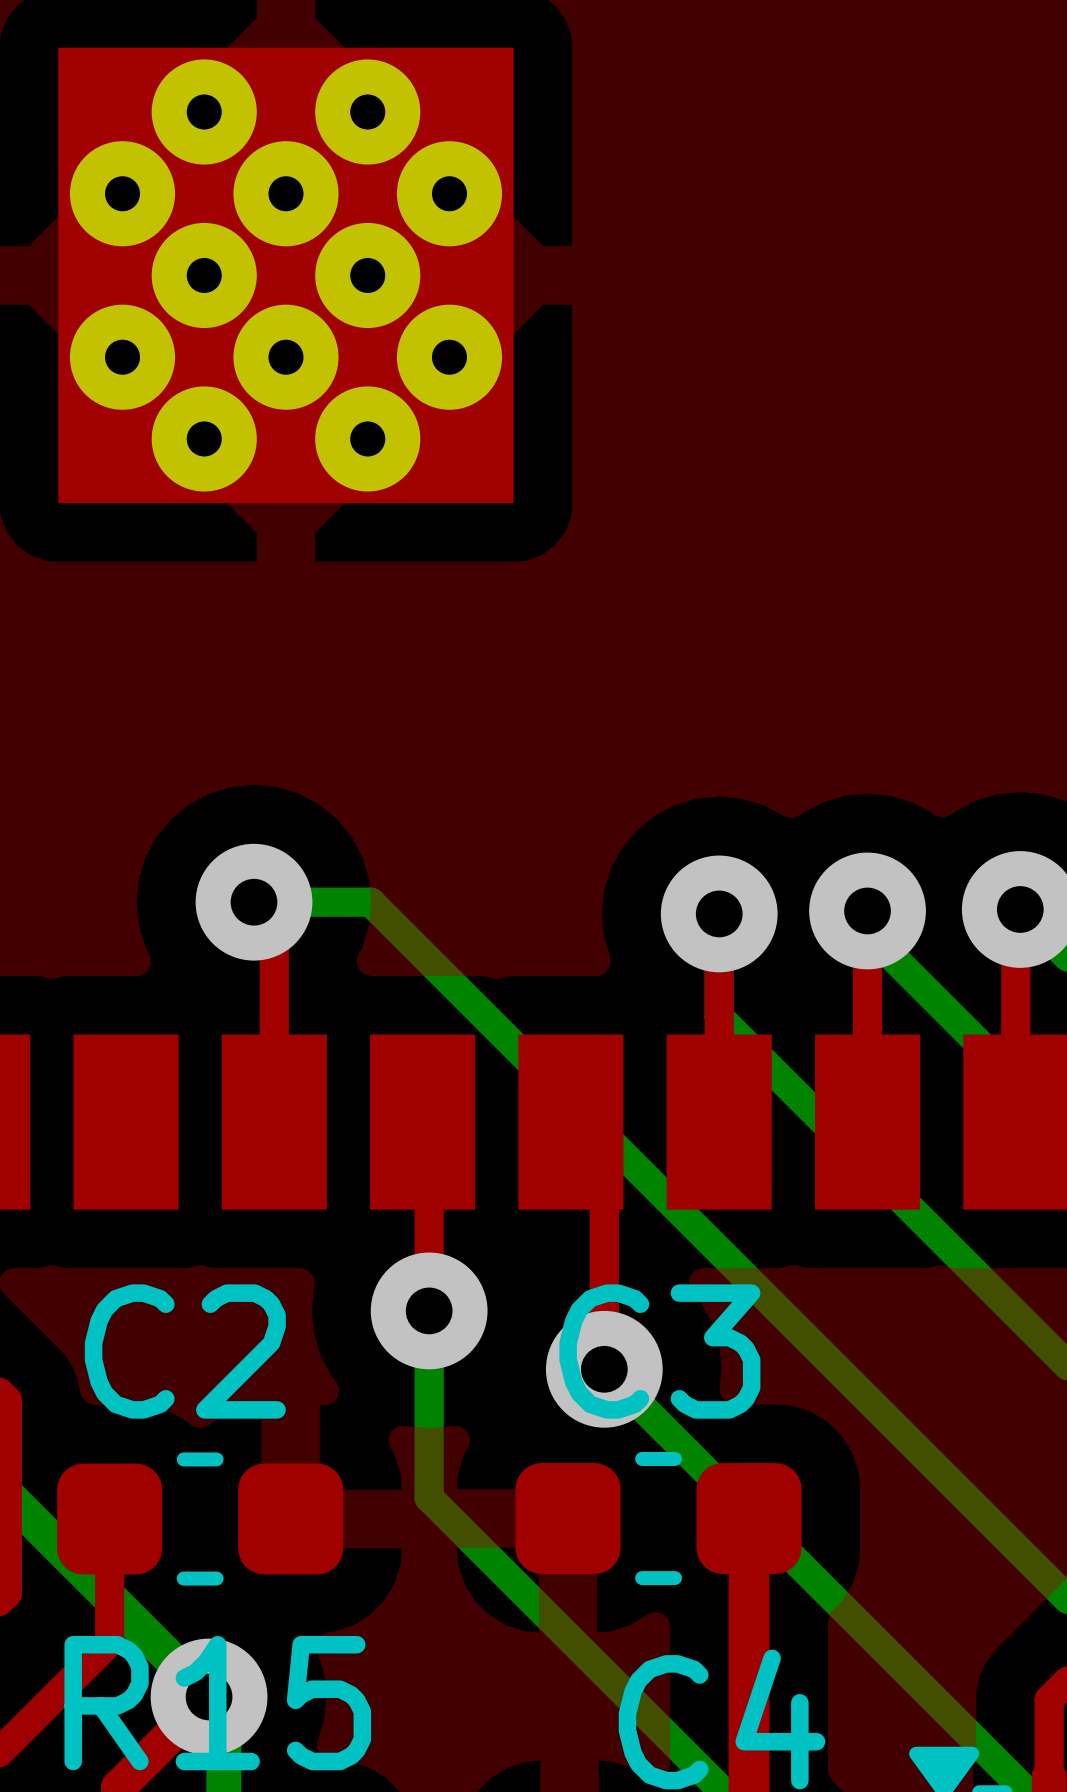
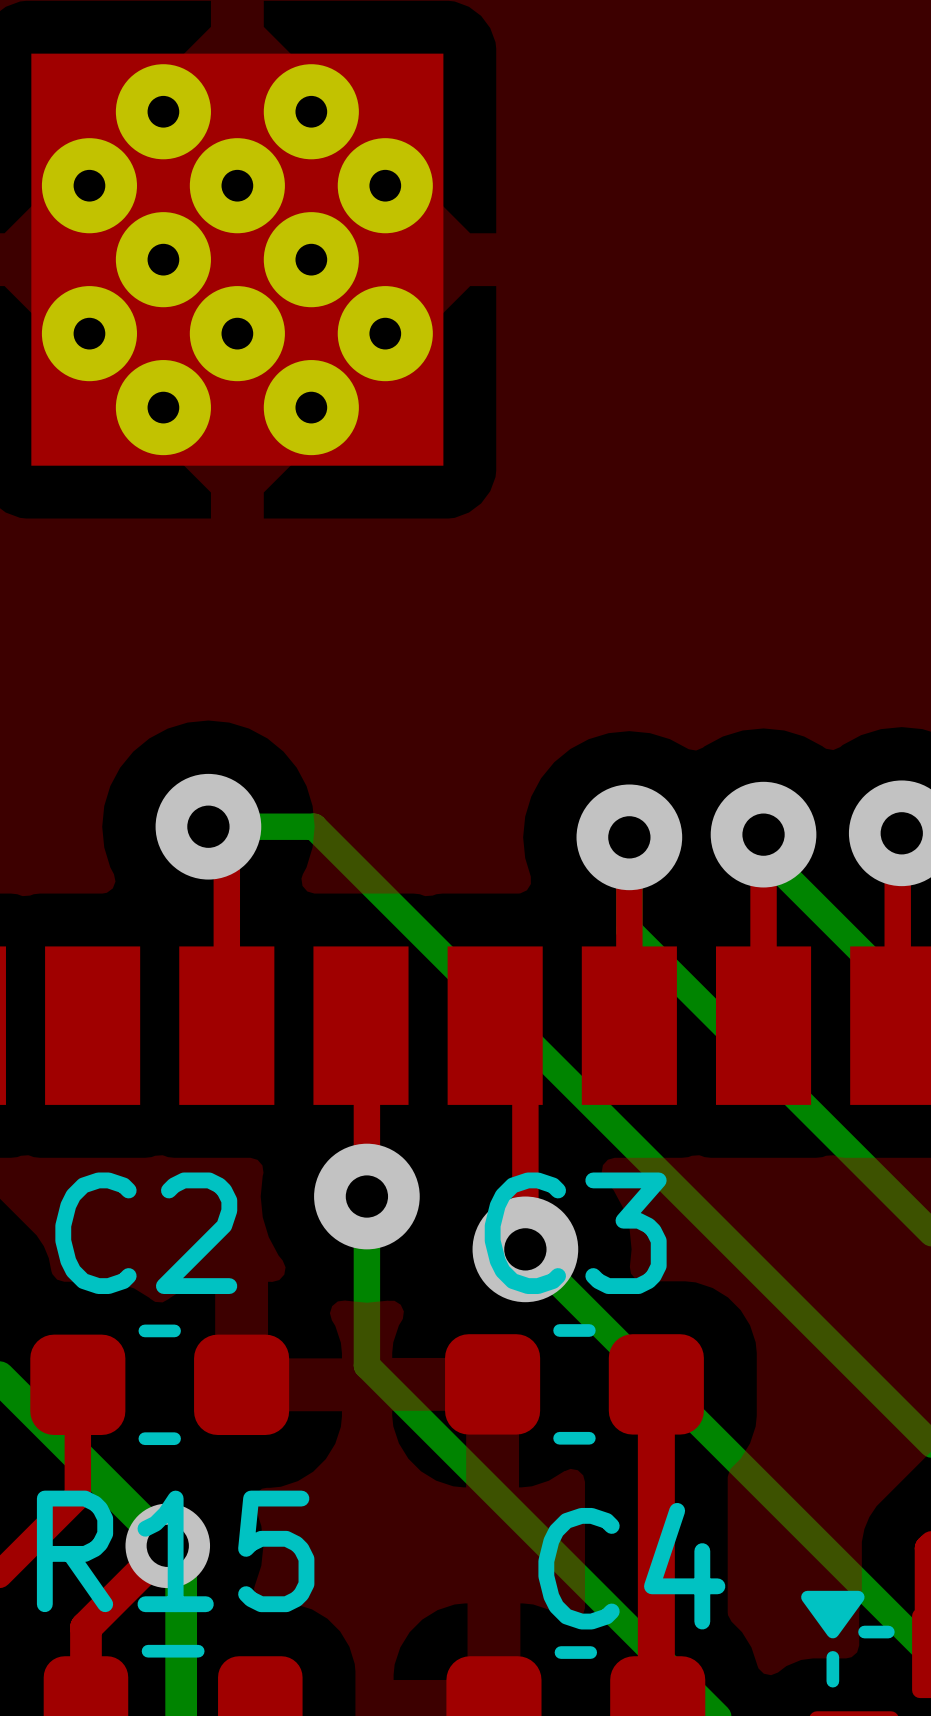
via size: [150, 1638, 268, 1756] -> [125, 1503, 211, 1589]

